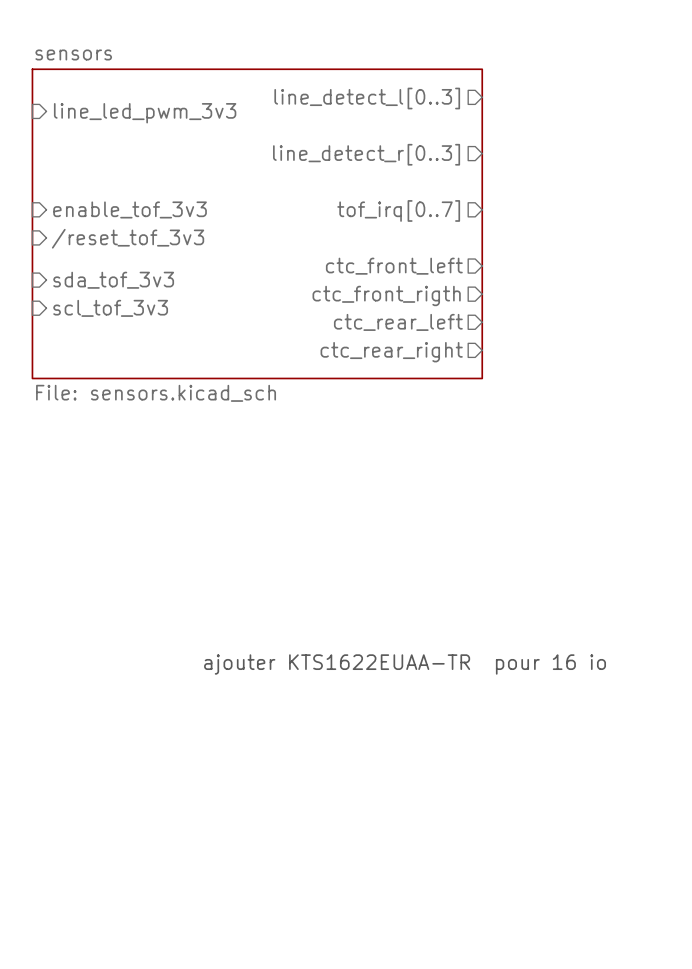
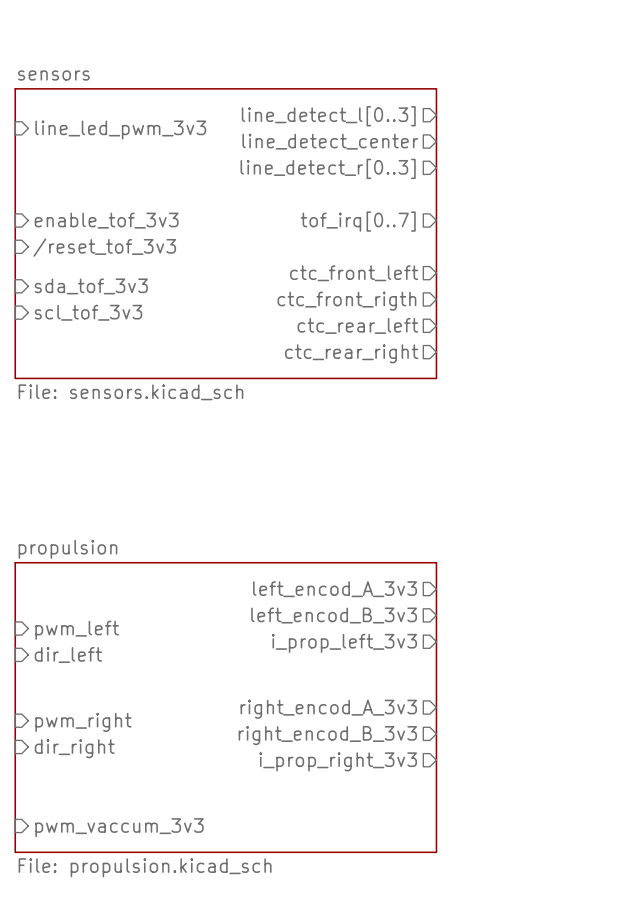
sheet pin: none -> line_detect_center (330, 141)
sheet pin: none -> left_encod_A_3v3 (335, 589)
sheet pin: none -> left_encod_B_3v3 (334, 615)
sheet pin: none -> pwm_left (77, 630)
sheet pin: none -> i_prop_left_3v3 (344, 643)
text: ajouter KTS1622EUAA-TR pour 16 io (405, 664) -> none
sheet pin: none -> dir_left (68, 655)
sheet propulsion: none -> File: propulsion.kicad_sch (225, 707)
sheet pin: none -> right_encod_A_3v3 (328, 709)
sheet pin: none -> pwm_right (83, 722)
sheet pin: none -> right_encod_B_3v3 (327, 735)
sheet pin: none -> dir_right (74, 748)
sheet pin: none -> i_prop_right_3v3 (338, 761)
sheet pin: none -> pwm_vaccum_3v3 (119, 827)

